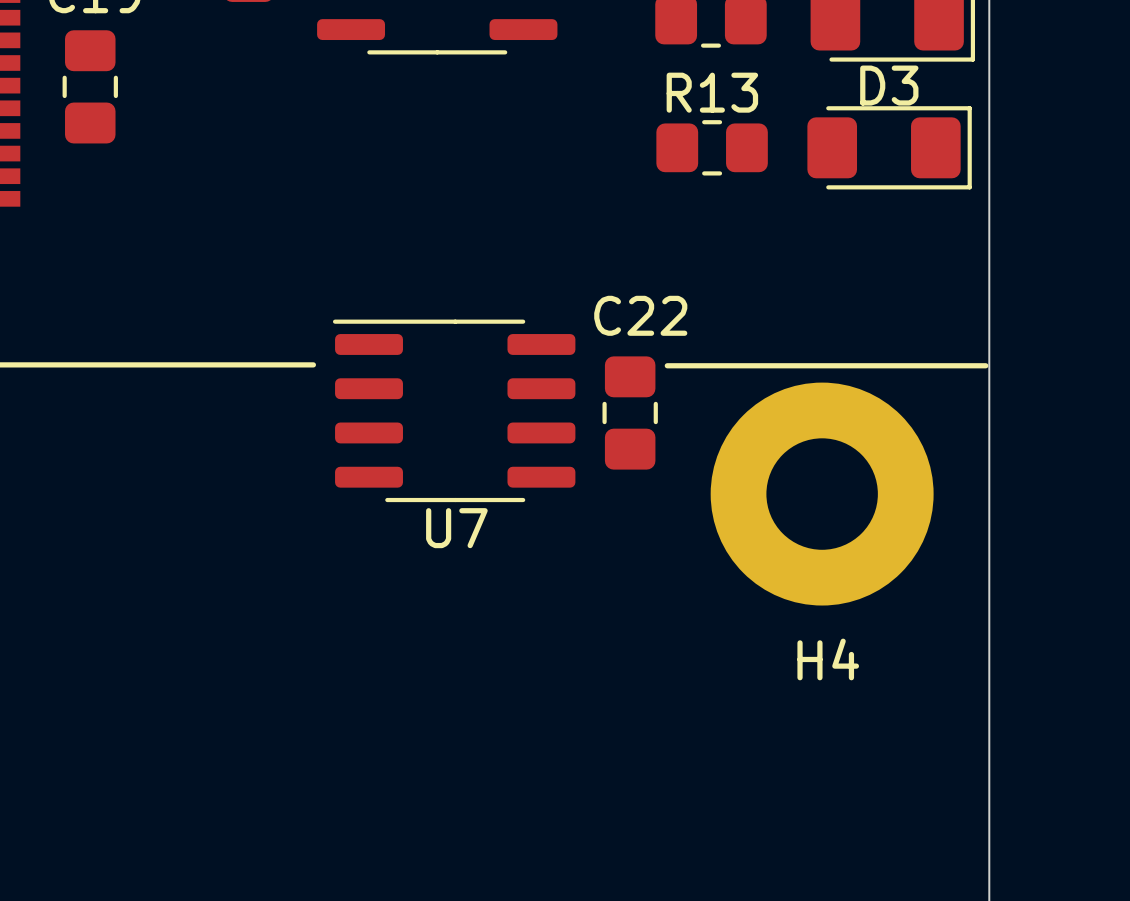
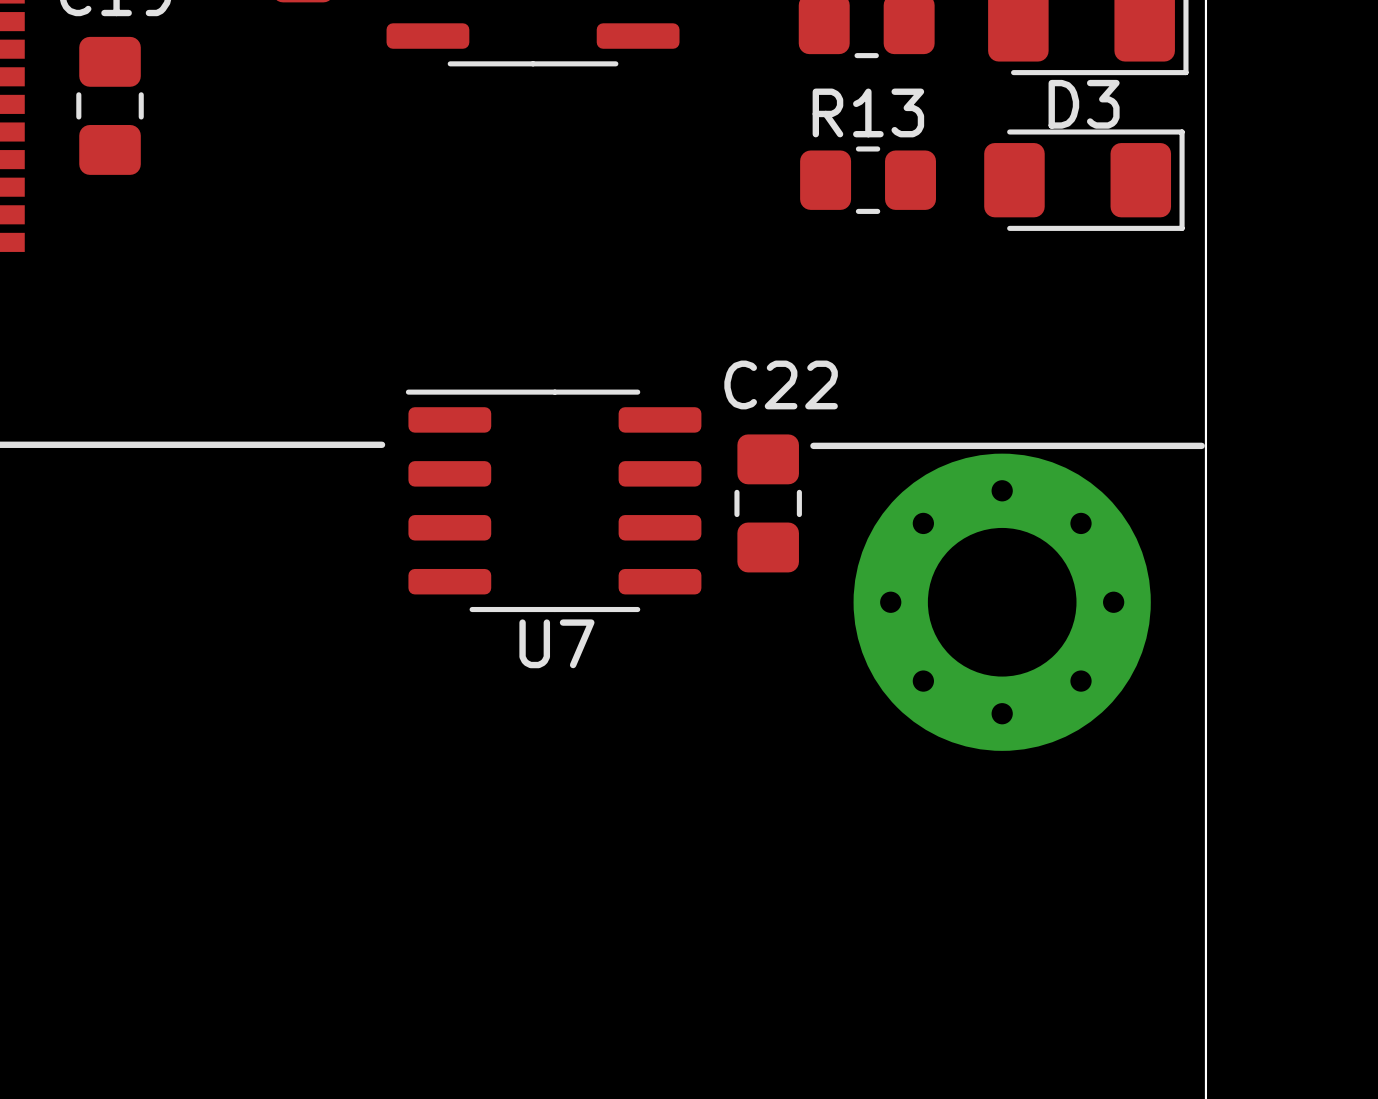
H4: (822, 494) -> none
part: none -> (1002, 602)

